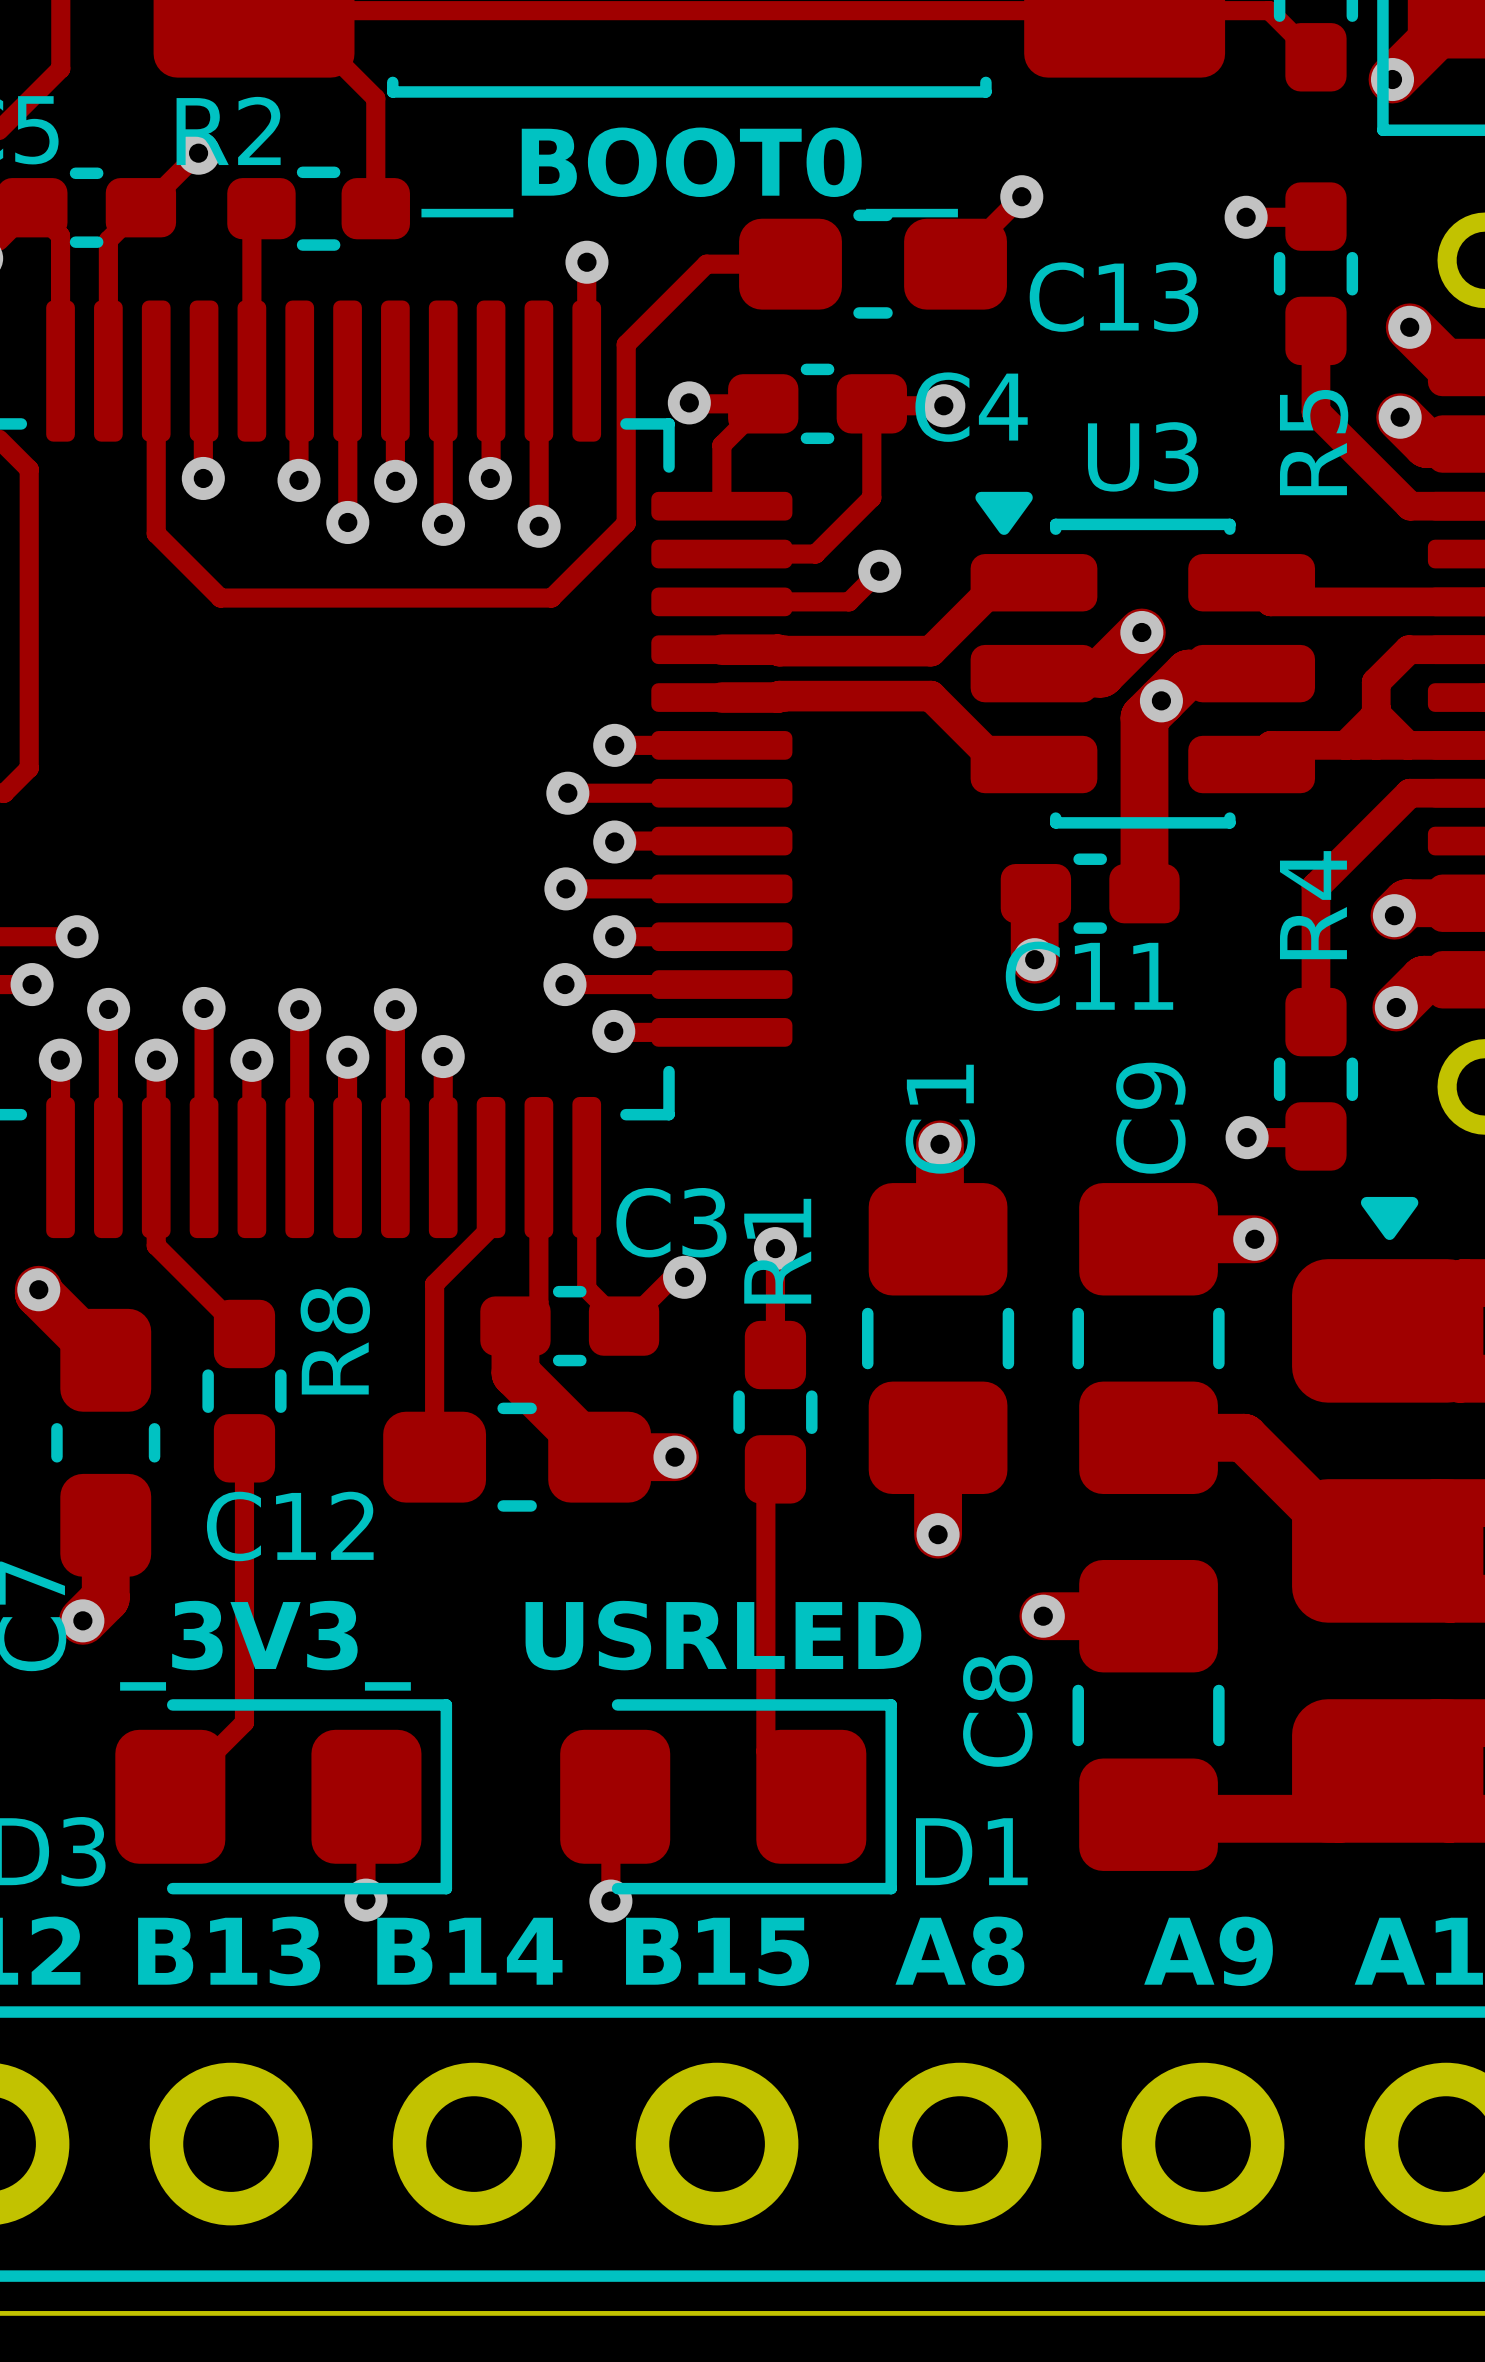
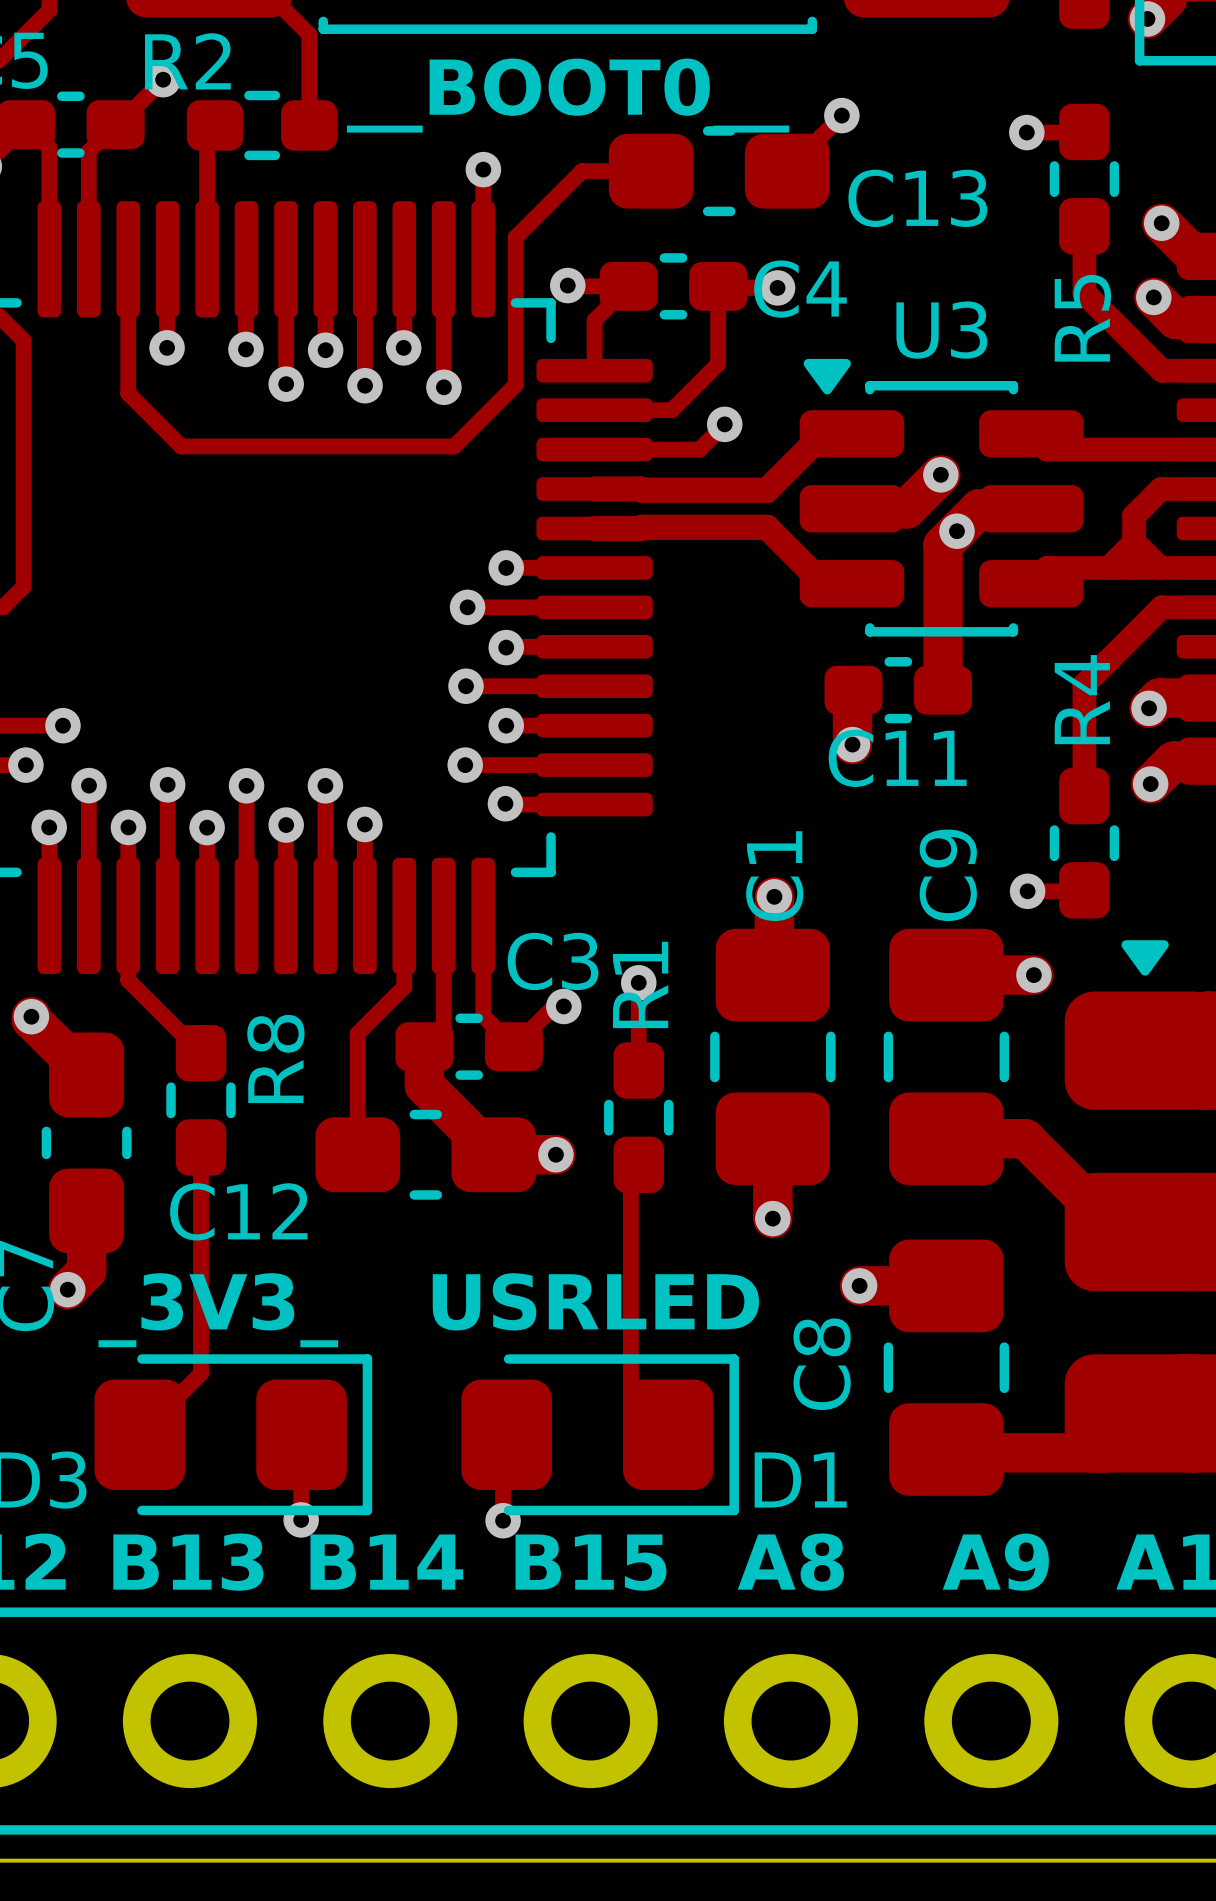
track: (491, 1227) (434, 1284) (434, 1310) -> (404, 965) (404, 986) (357, 1033)

